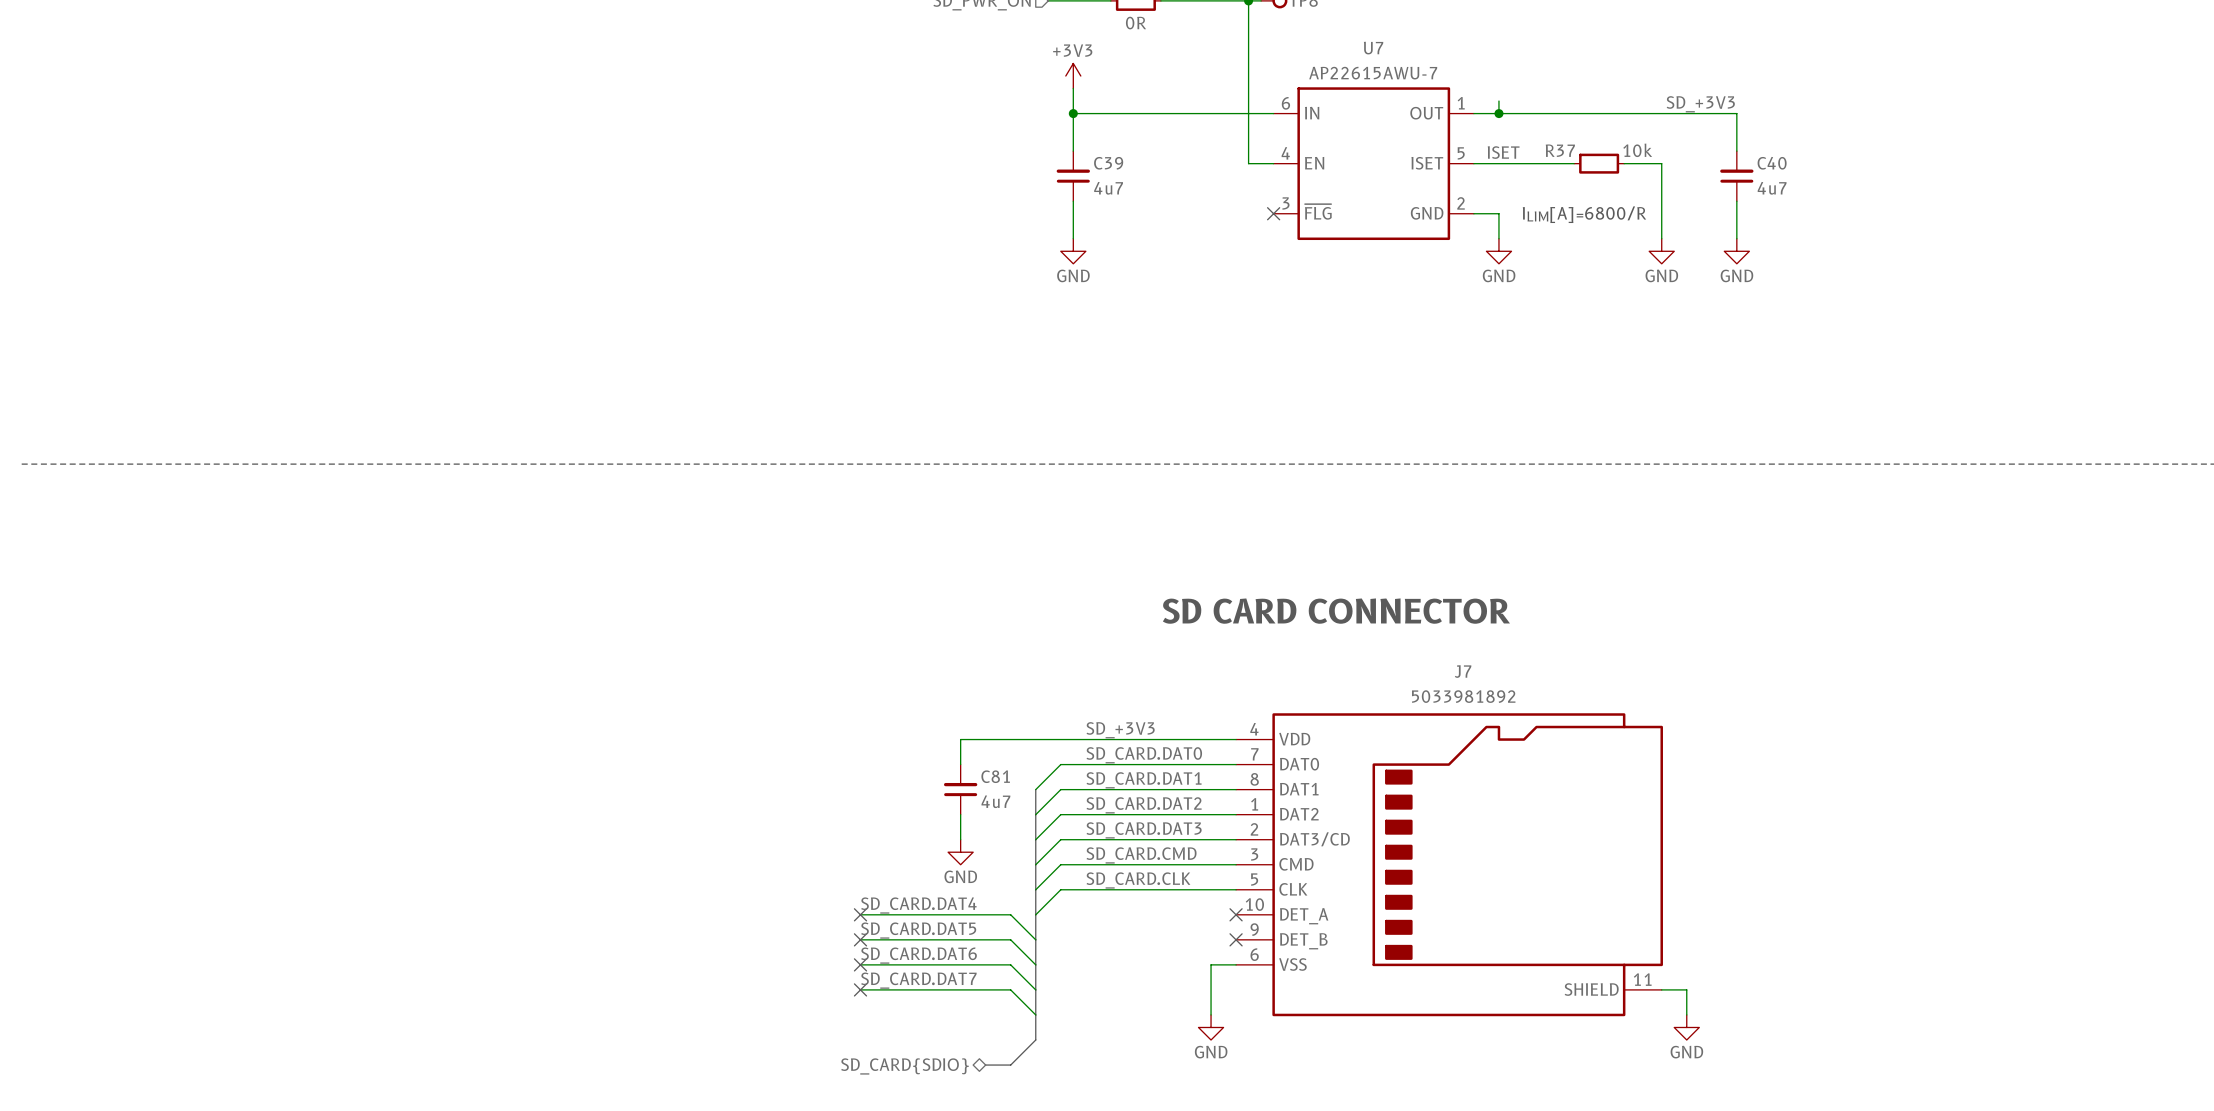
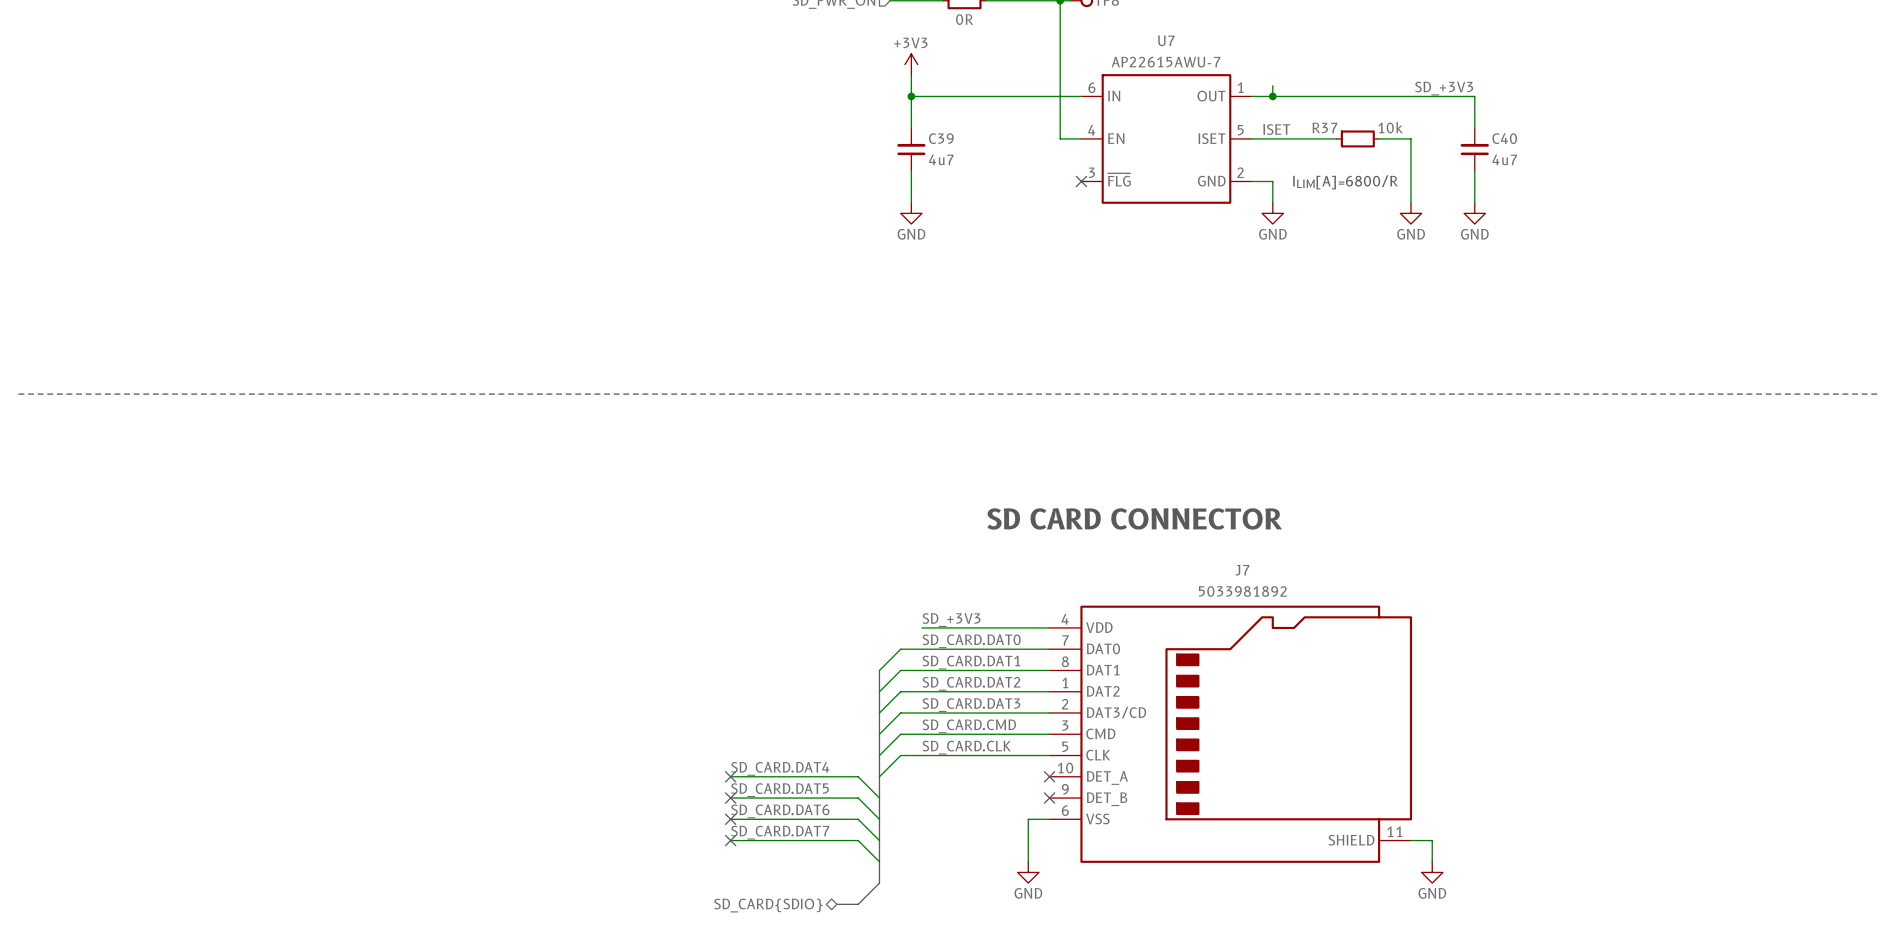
wire: (1085, 739) (960, 739) (960, 764) -> none
C81: (960, 789) -> none
wire: (960, 814) (960, 839) -> none
power symbol: GND (960, 852) -> none

